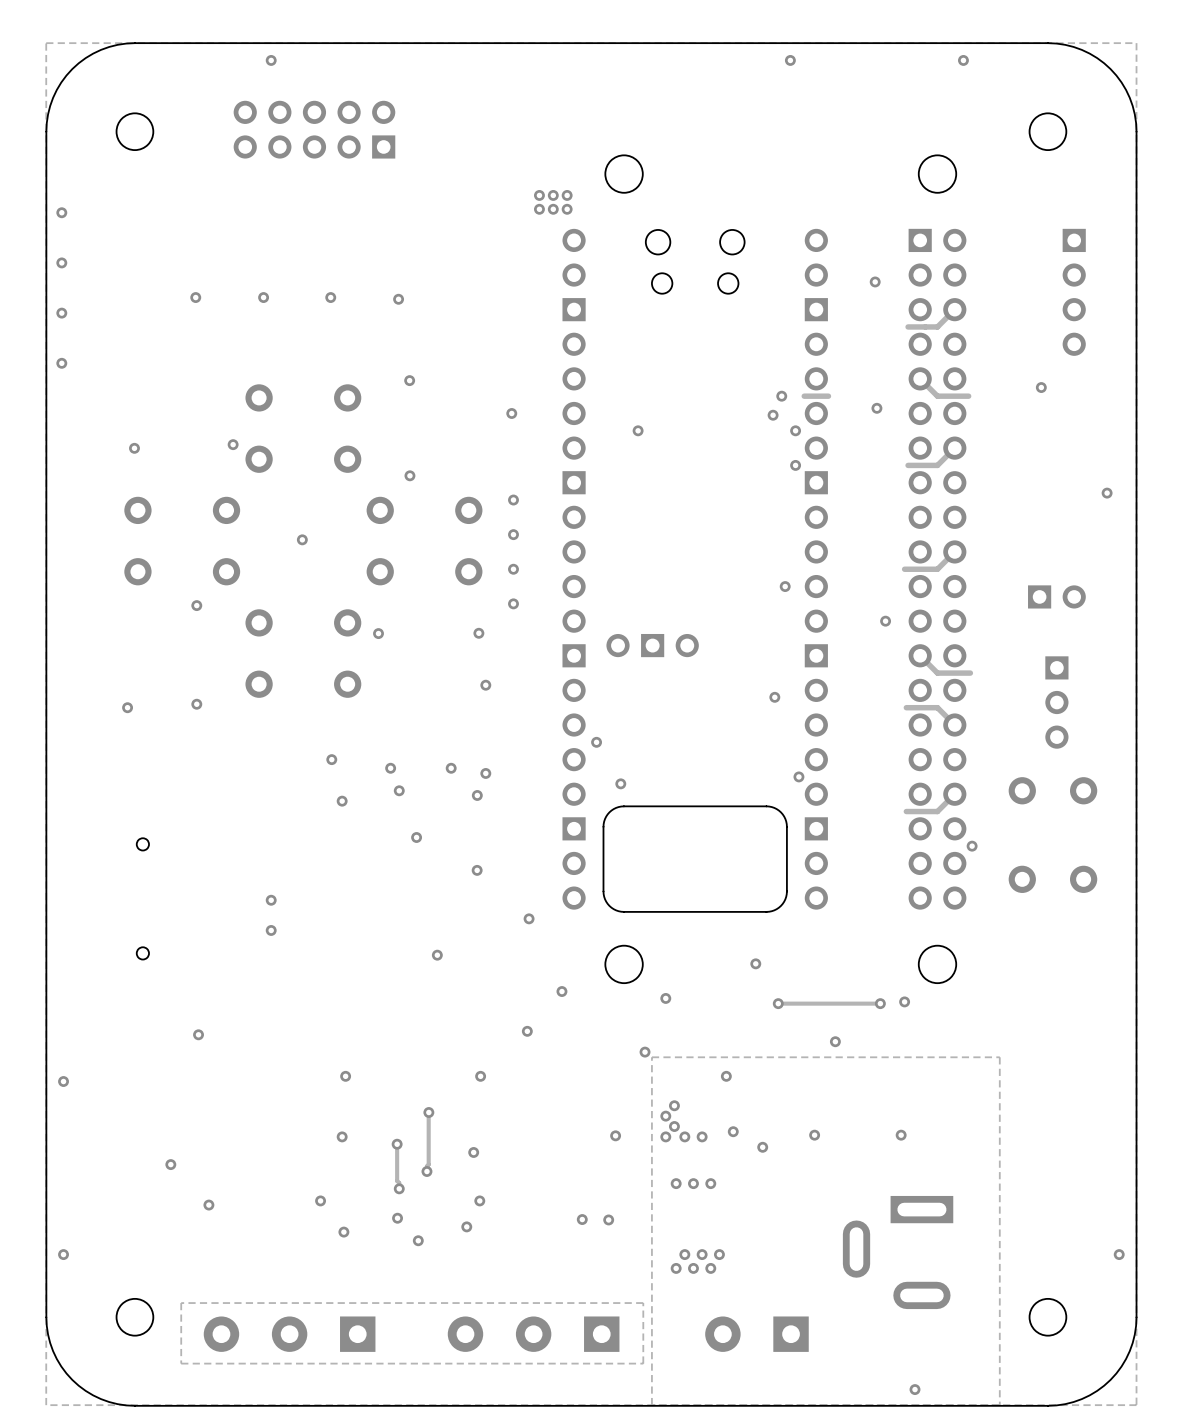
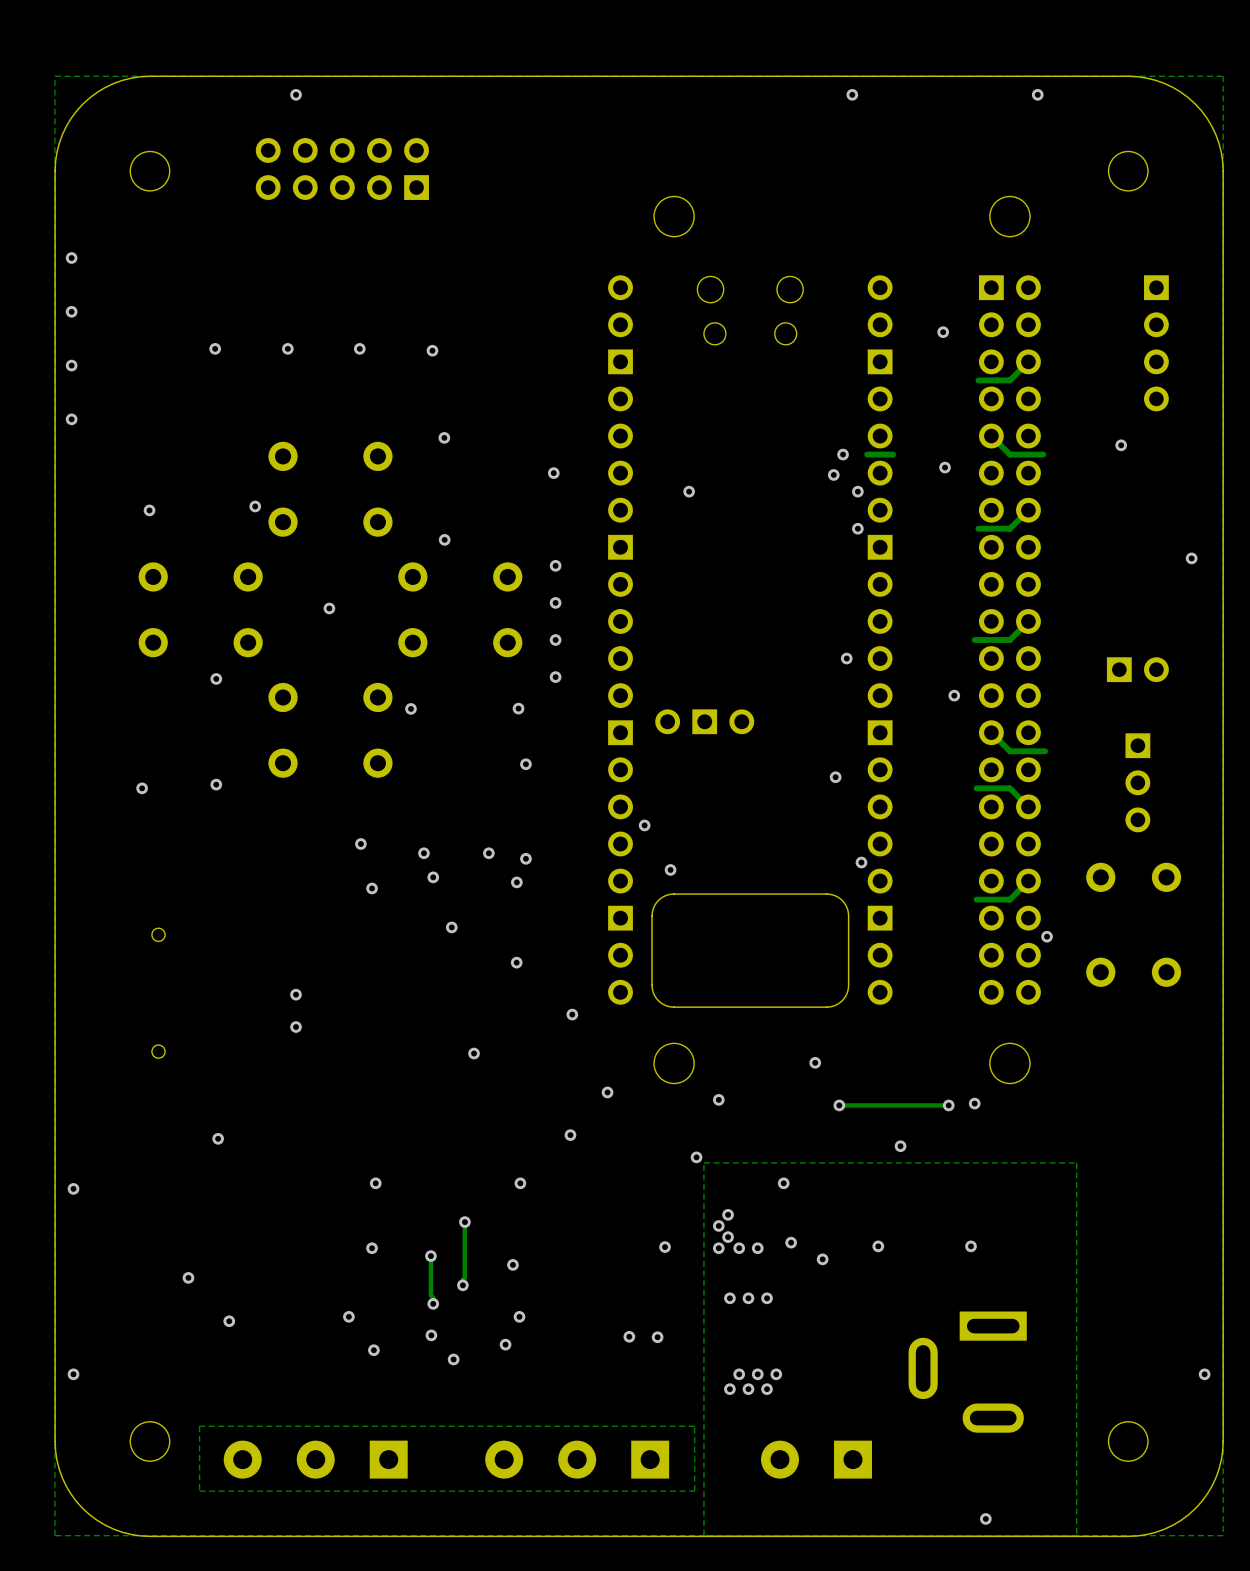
via: (539, 195) -> none
via: (553, 195) -> none
via: (567, 195) -> none
via: (539, 209) -> none
via: (553, 209) -> none
via: (567, 209) -> none

